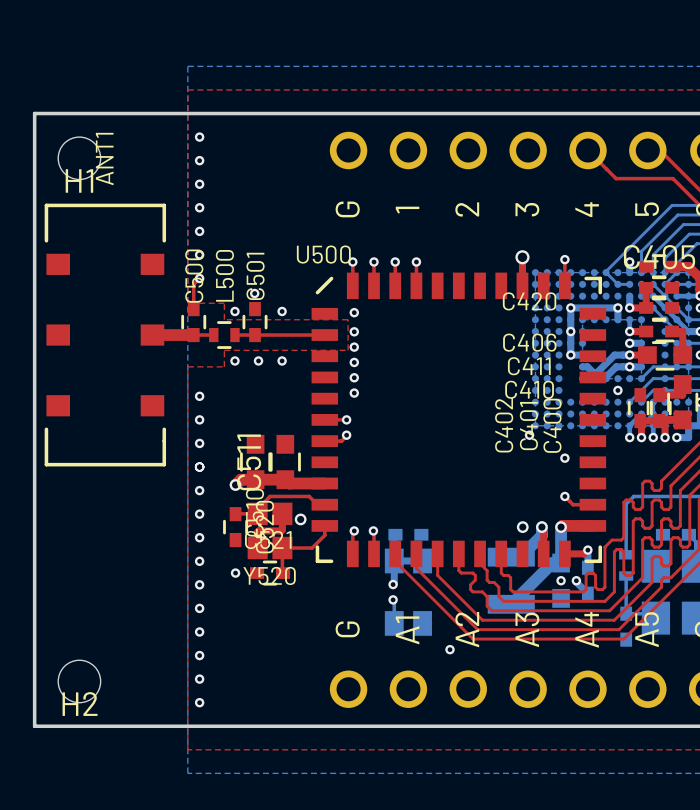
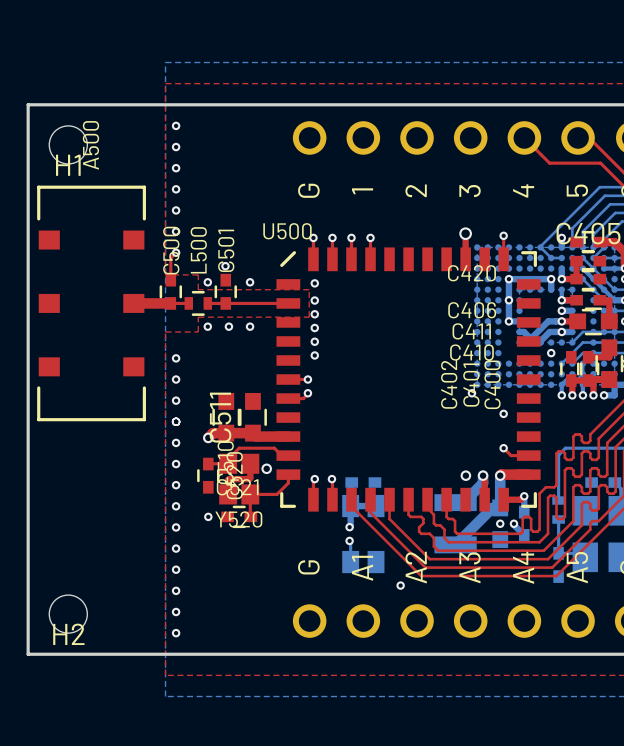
ANT1 name: ANT1 (104, 159) -> A500 (90, 145)

